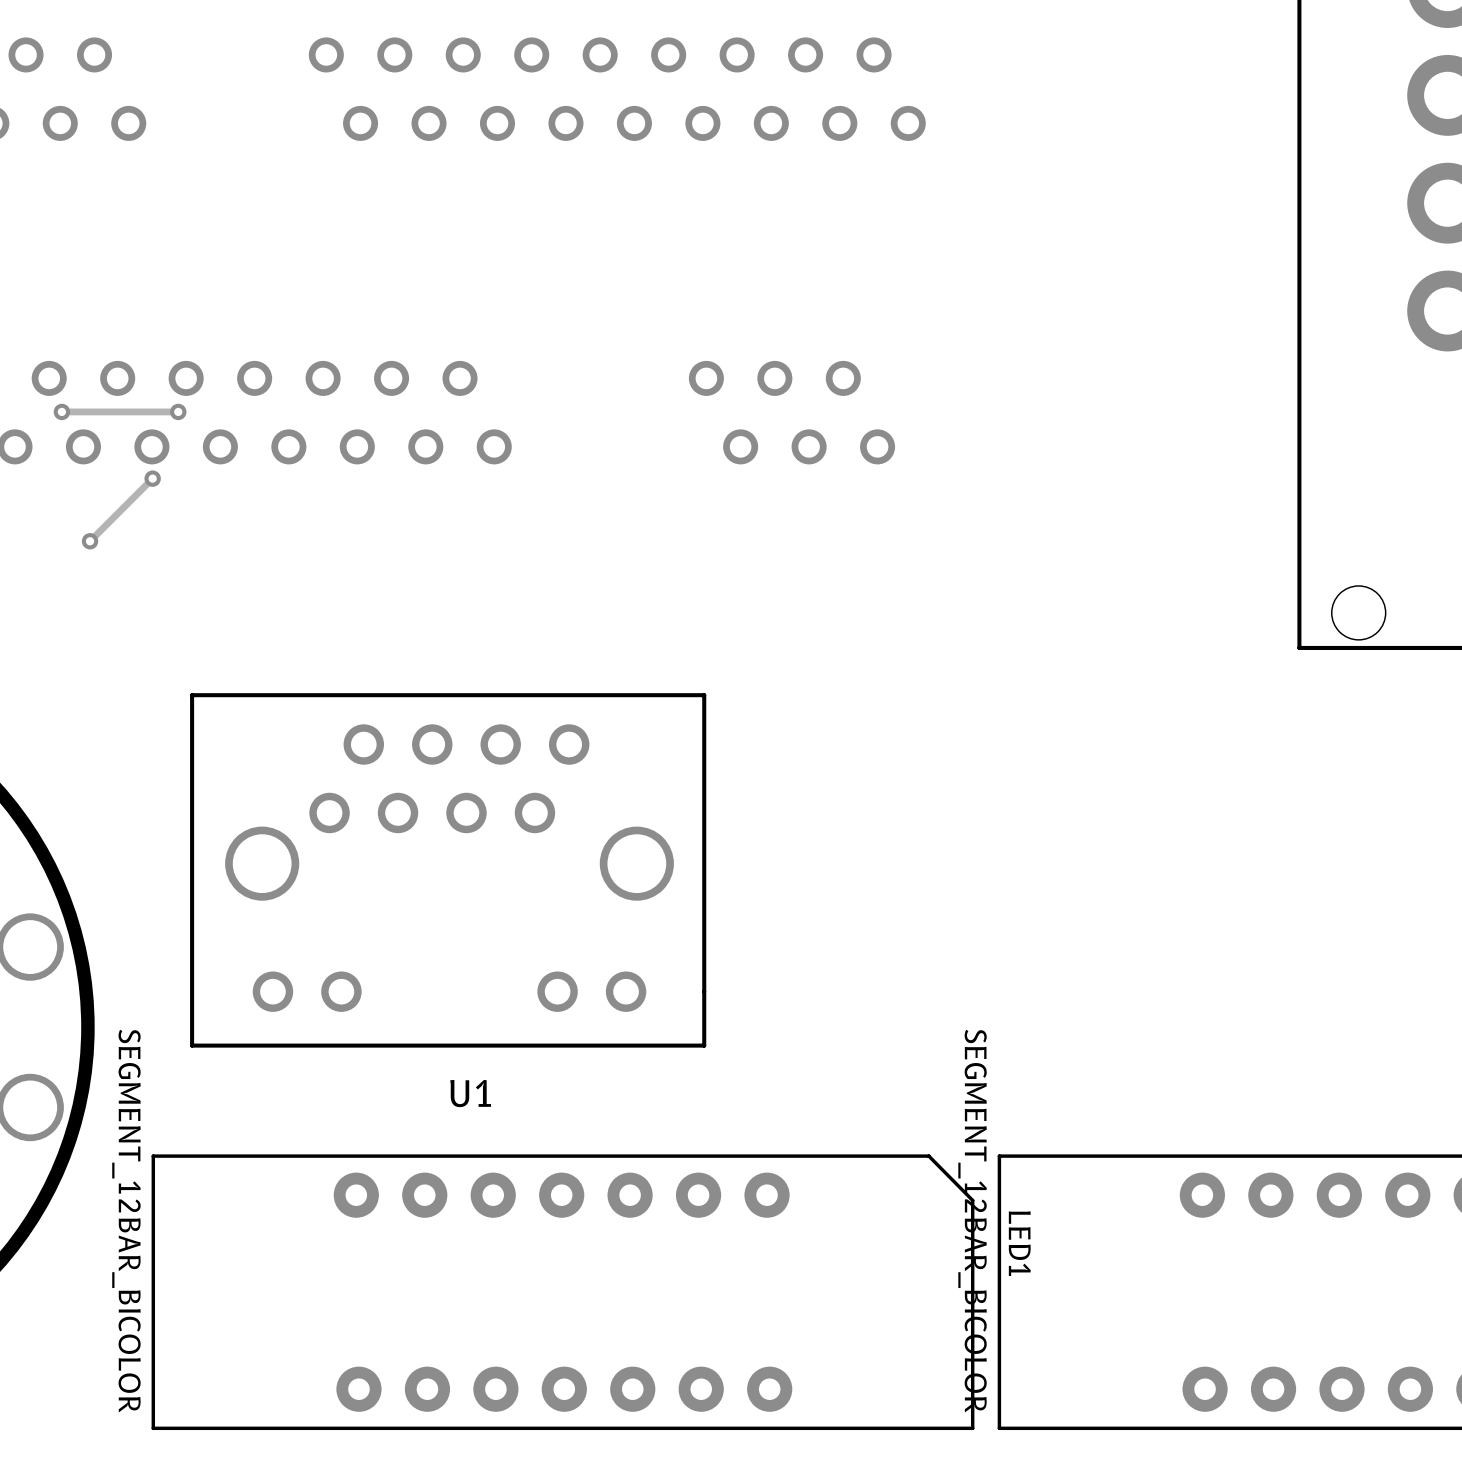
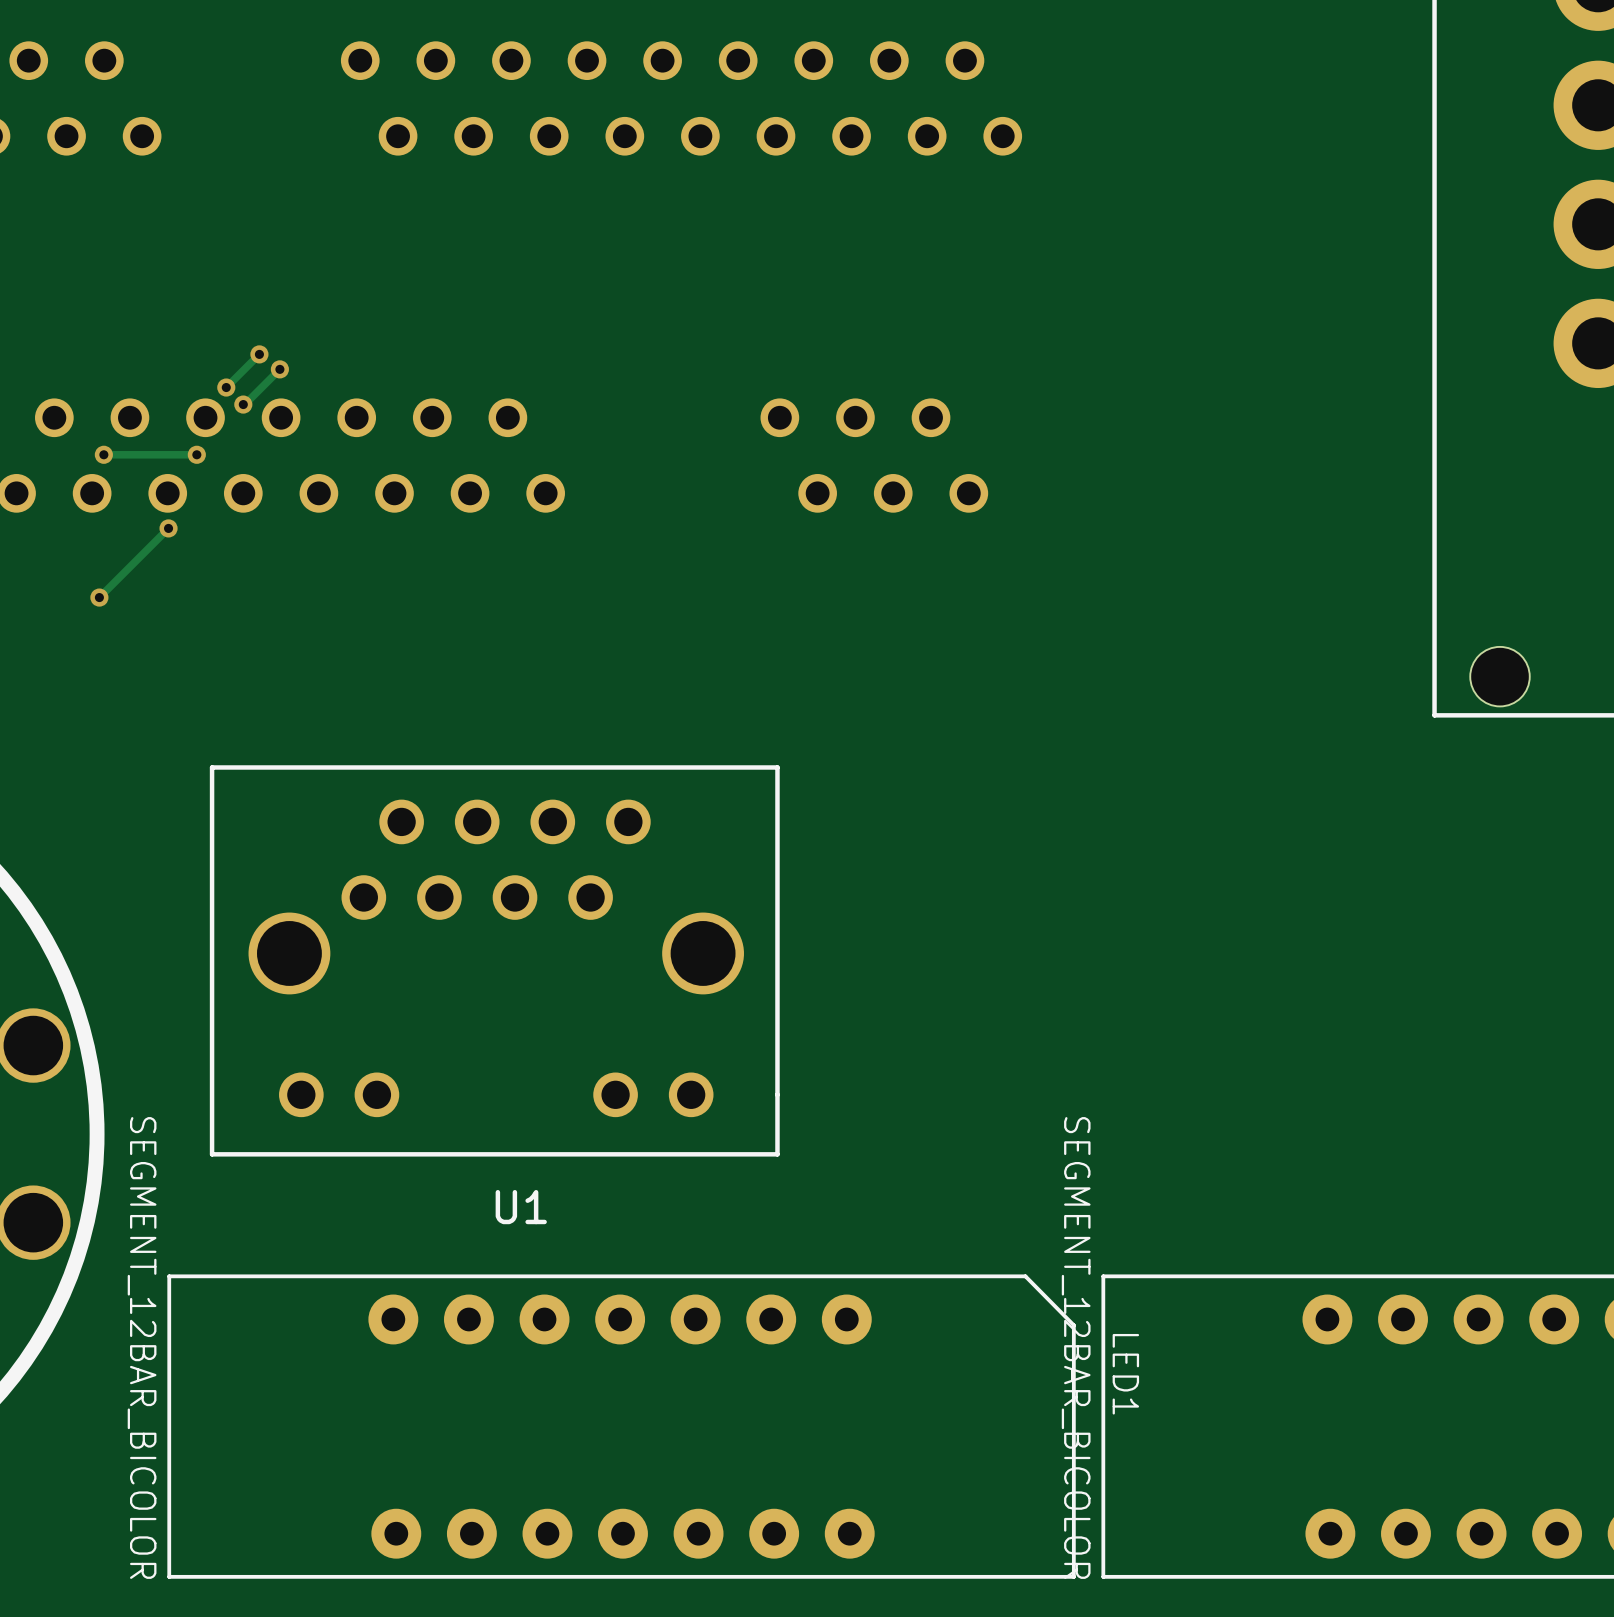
track: none -> (259, 354) (226, 387)
via: none -> (259, 354)
track: none -> (279, 369) (243, 404)
via: none -> (279, 369)
via: none -> (226, 387)
via: none -> (243, 404)
via position: (61, 411) -> (103, 454)
track: (94, 411) (61, 411) -> none

